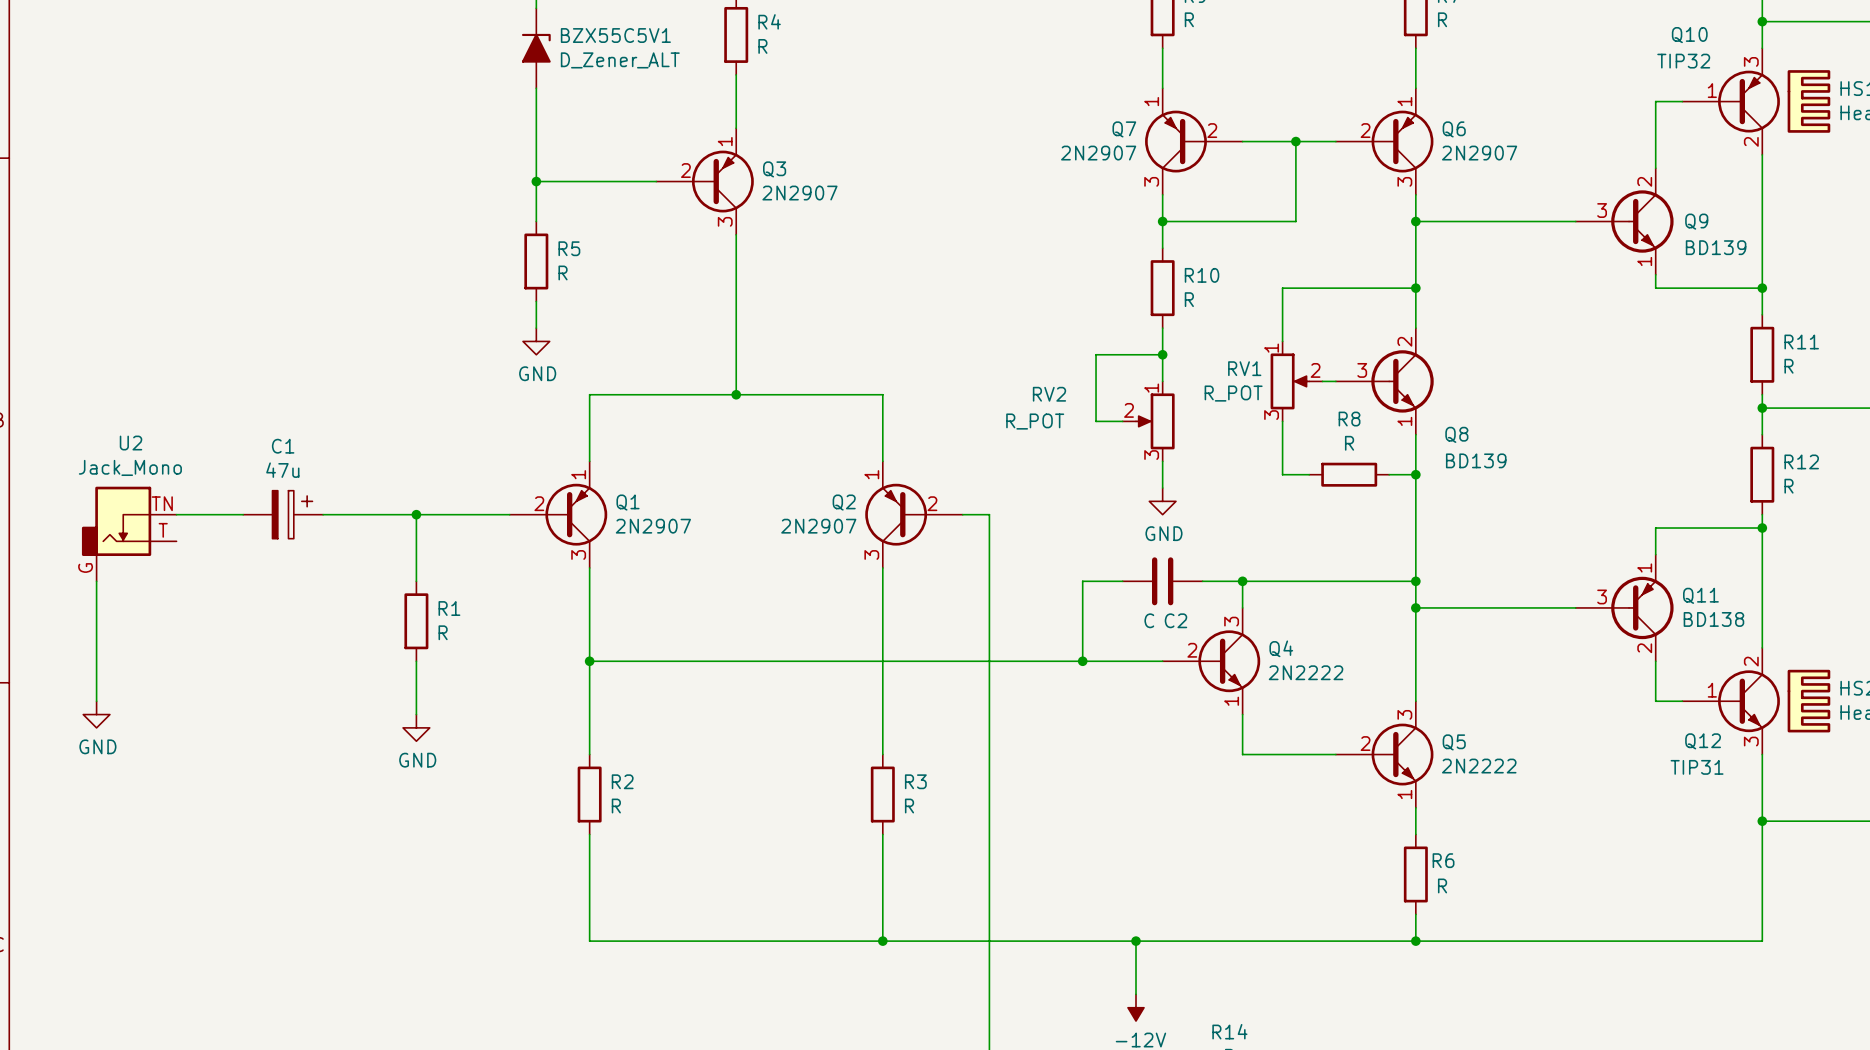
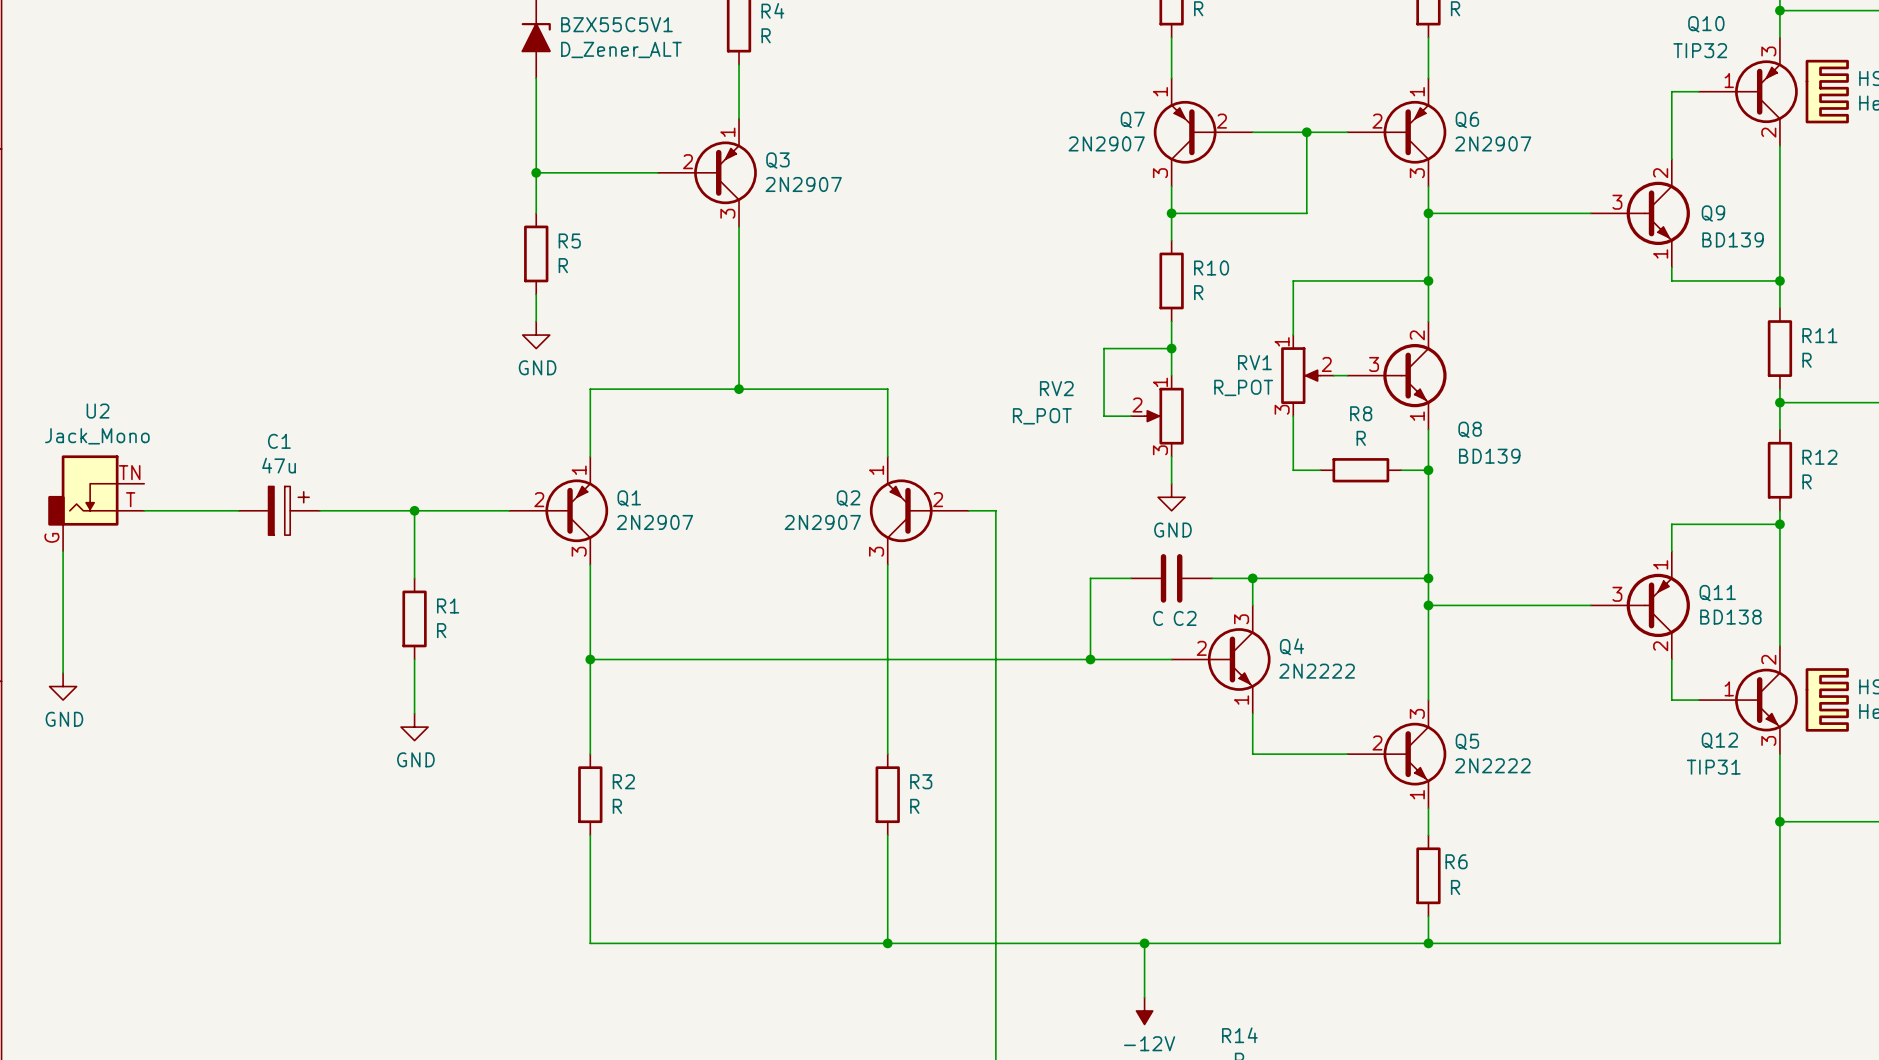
U2 position: (129, 534) -> (96, 503)
wire: (96, 581) (96, 701) -> (63, 551) (63, 673)
power symbol position: GND (96, 714) -> GND (63, 686)

